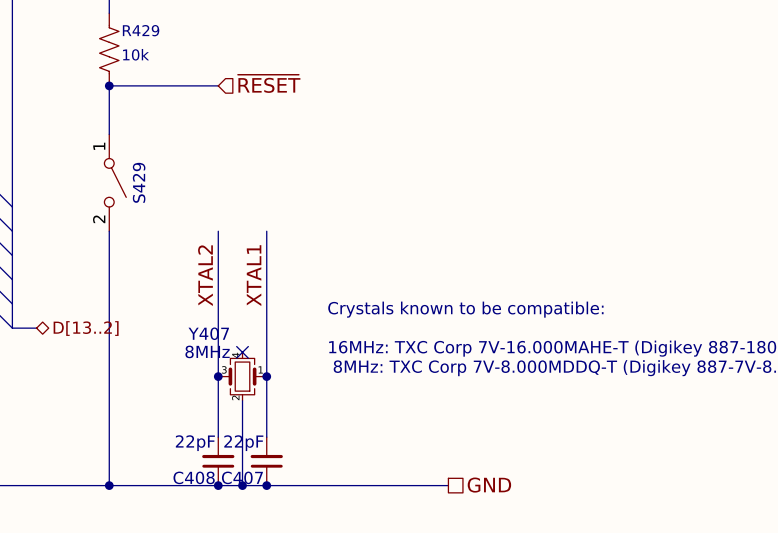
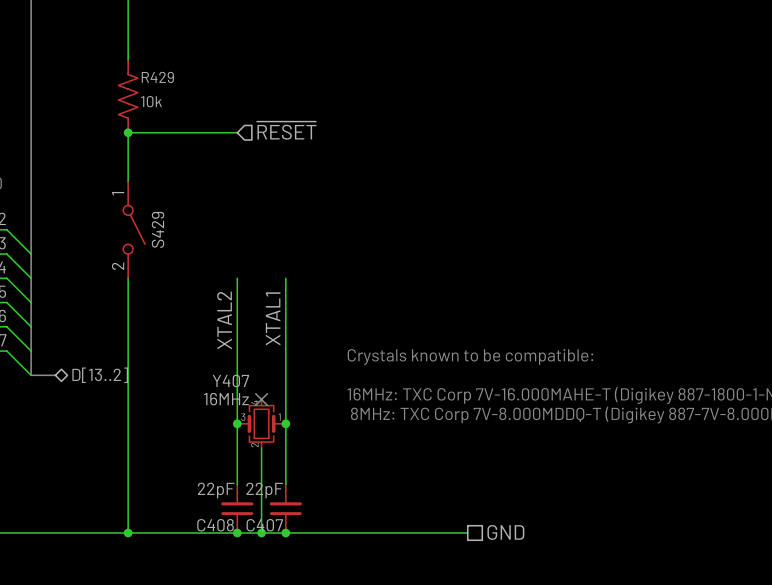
Y407 value: 8MHz (207, 351) -> 16MHz (226, 399)

